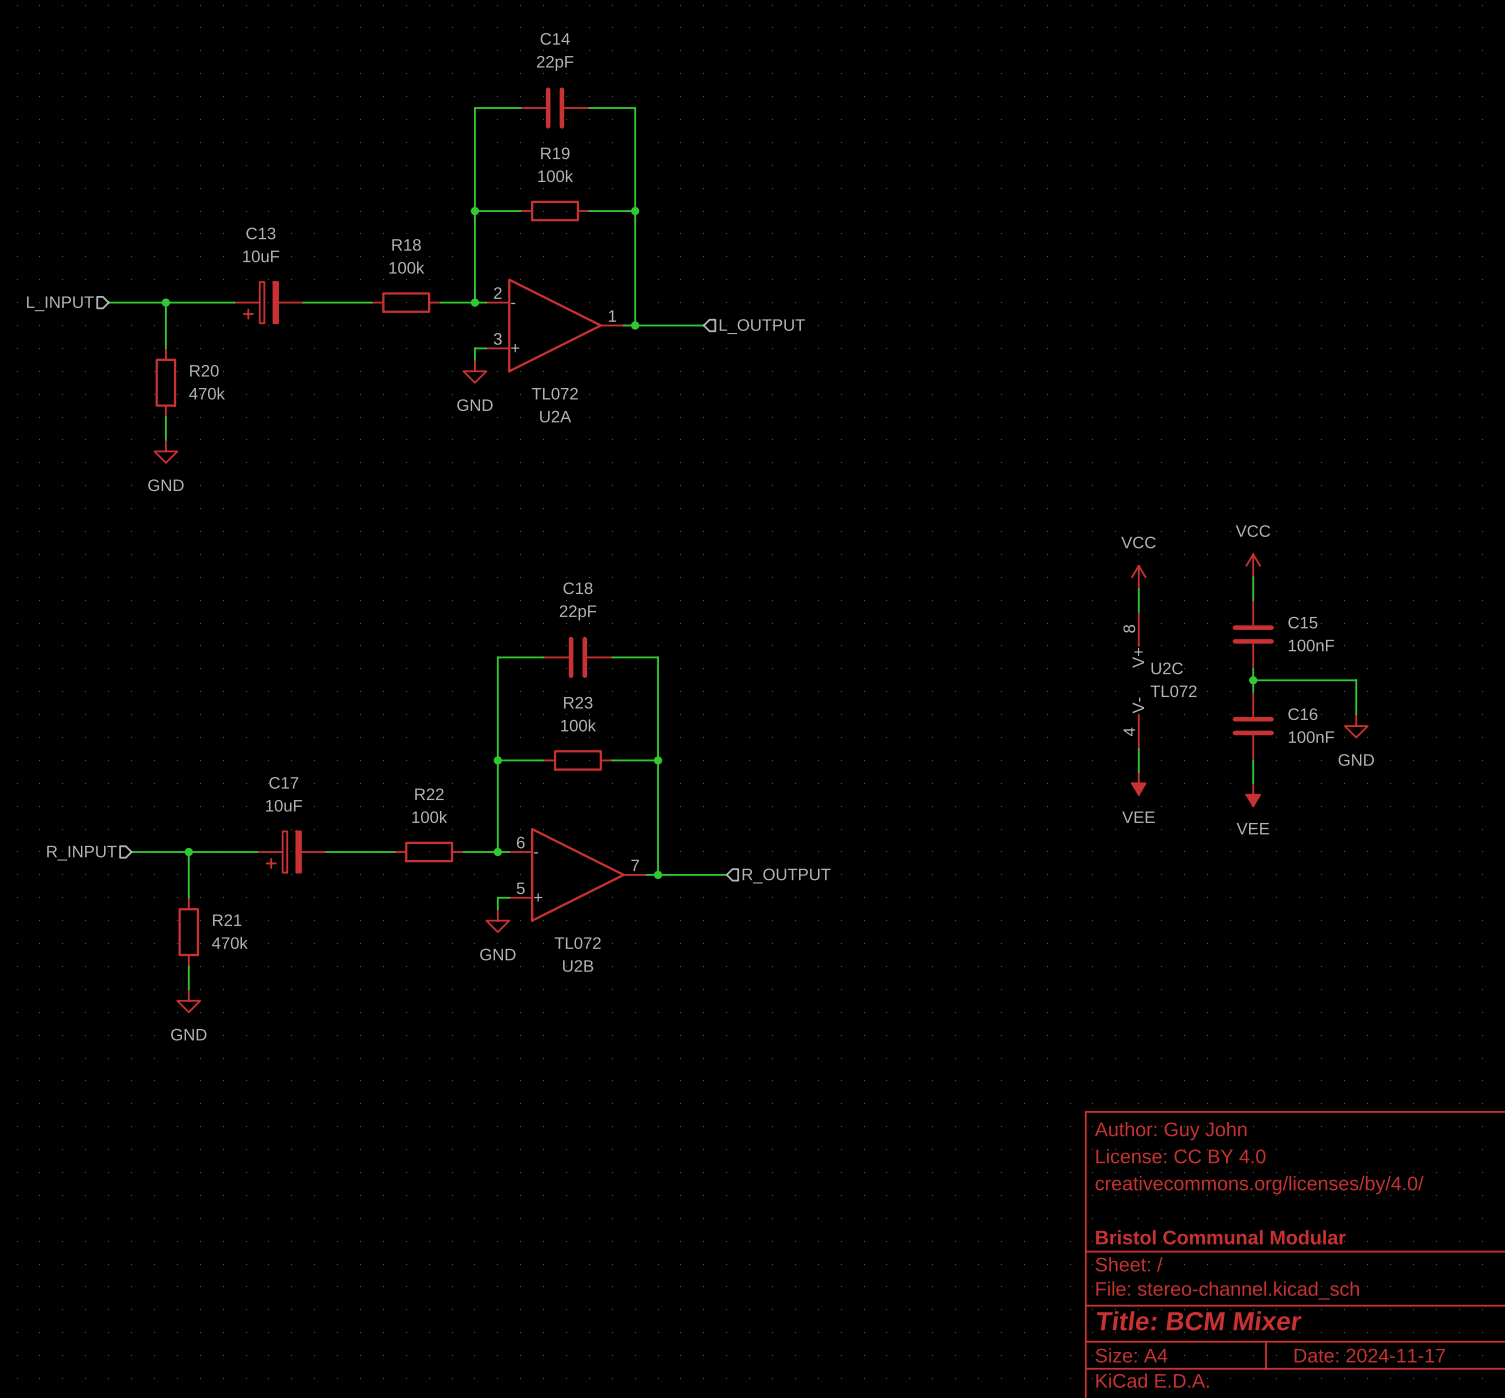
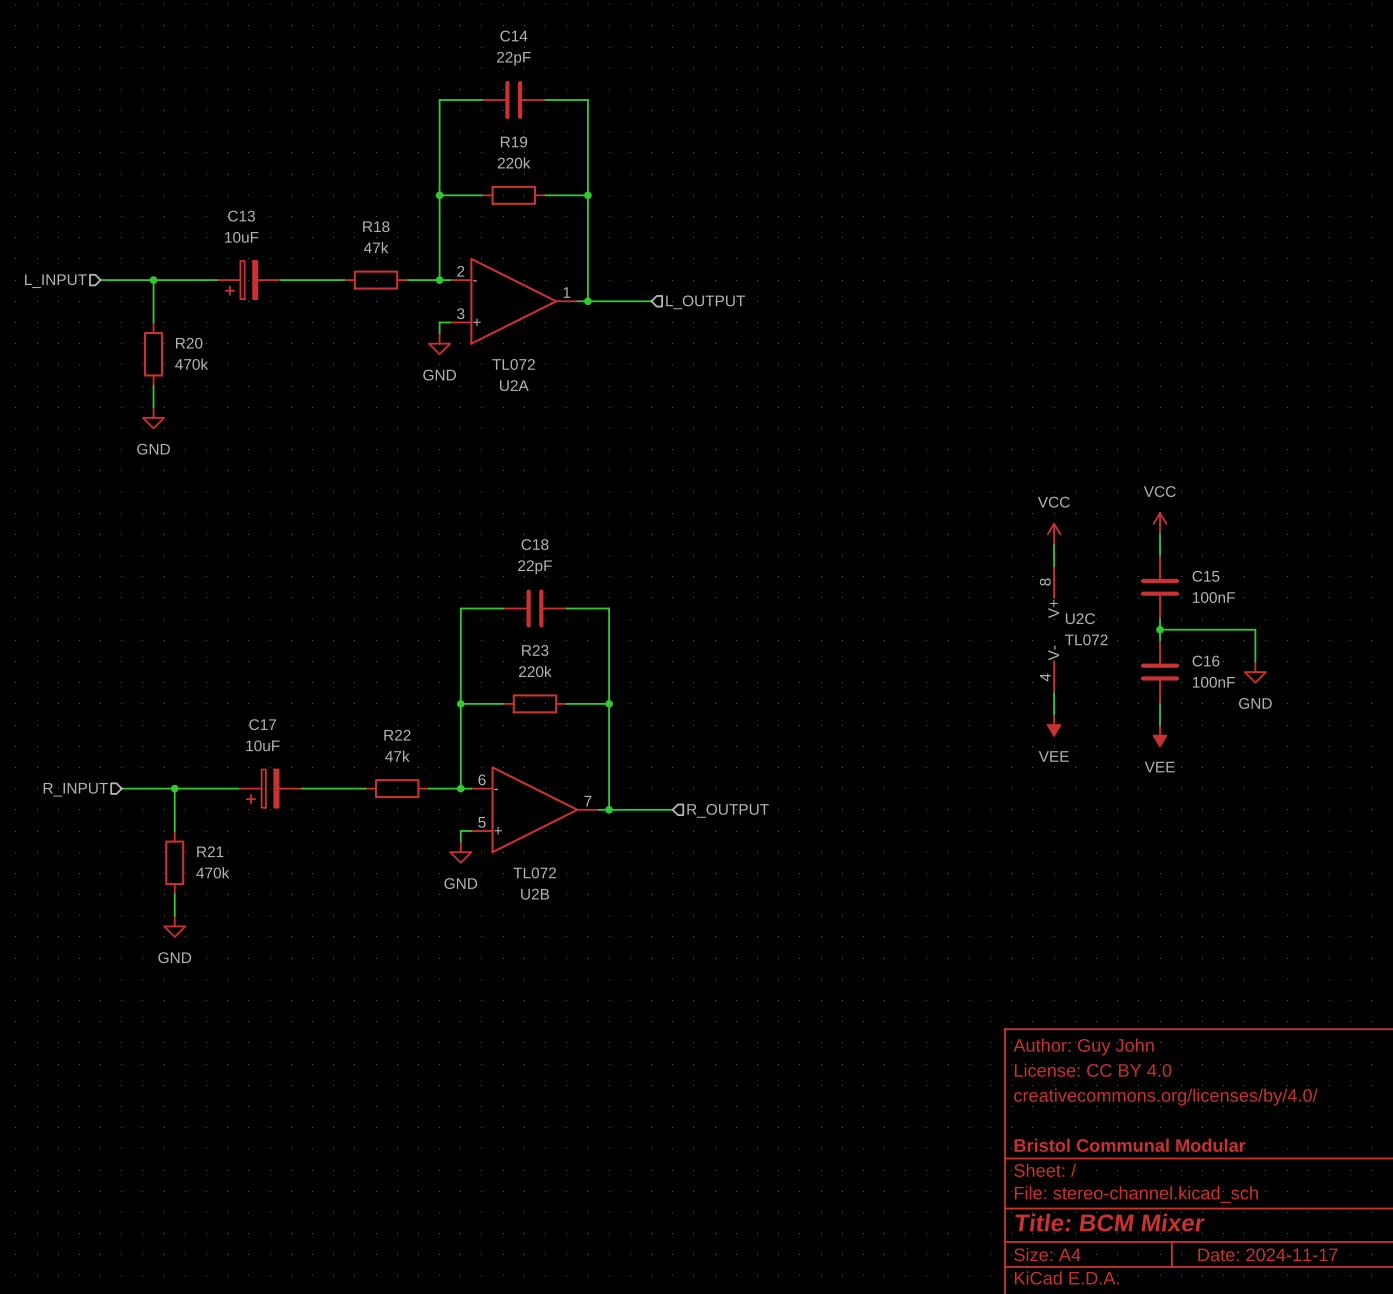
R19 value: 100k (555, 176) -> 220k (514, 162)
R18 value: 100k (406, 267) -> 47k (376, 247)
R23 value: 100k (578, 725) -> 220k (535, 671)
R22 value: 100k (429, 817) -> 47k (397, 756)

